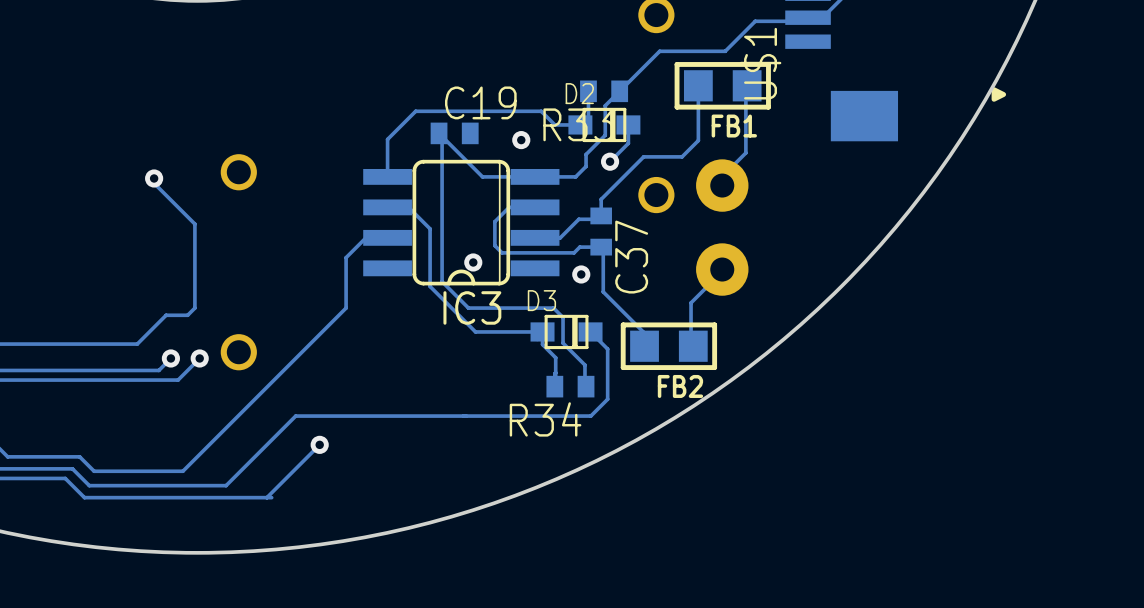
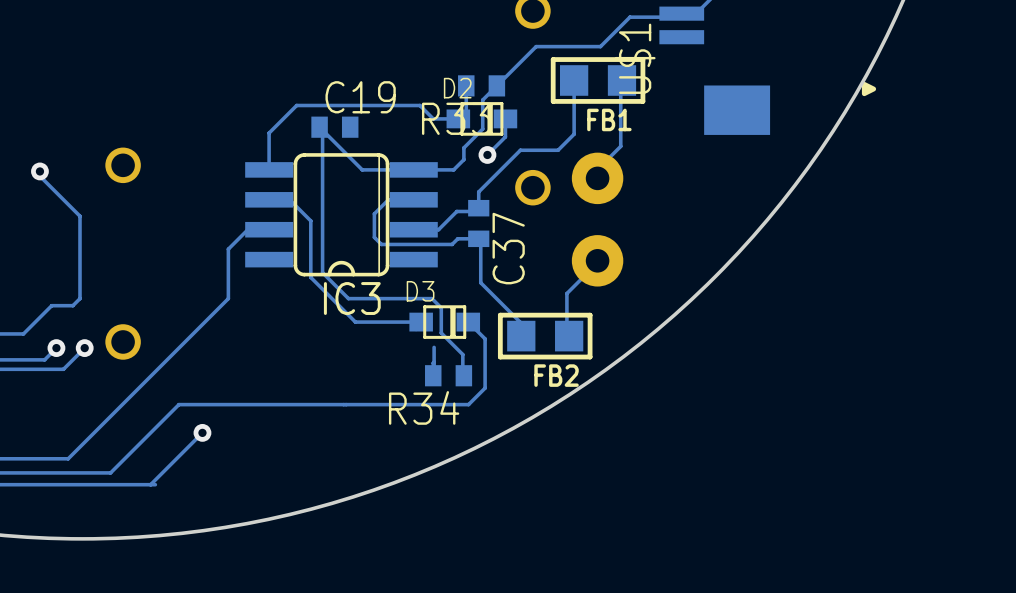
via: (521, 140) -> none
via: (473, 262) -> none
via: (581, 274) -> none
track: (542, 331) (542, 344) (555, 357) -> none

